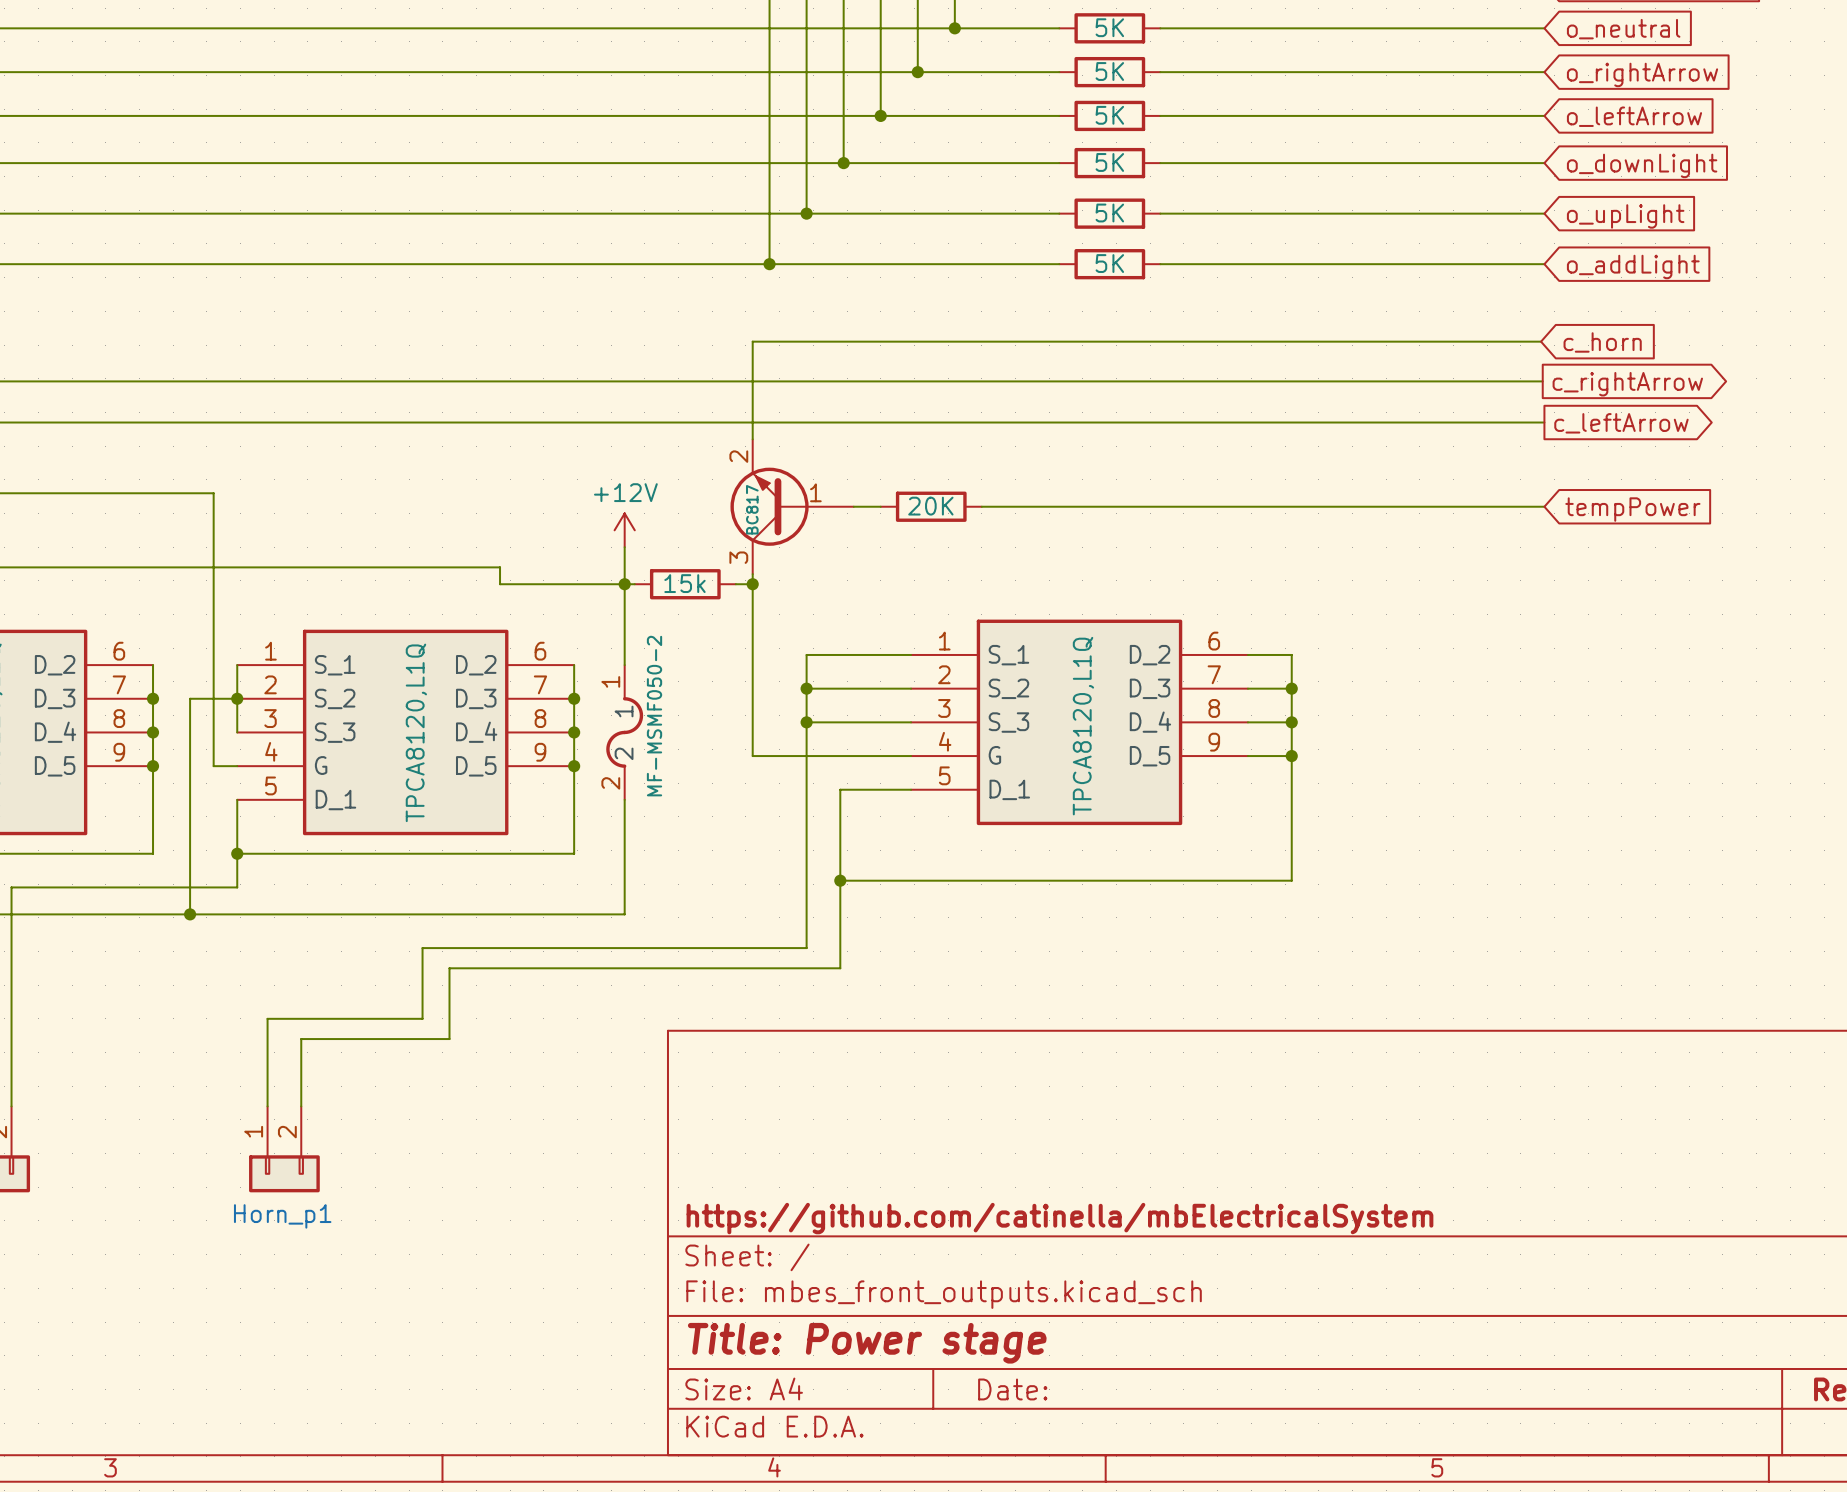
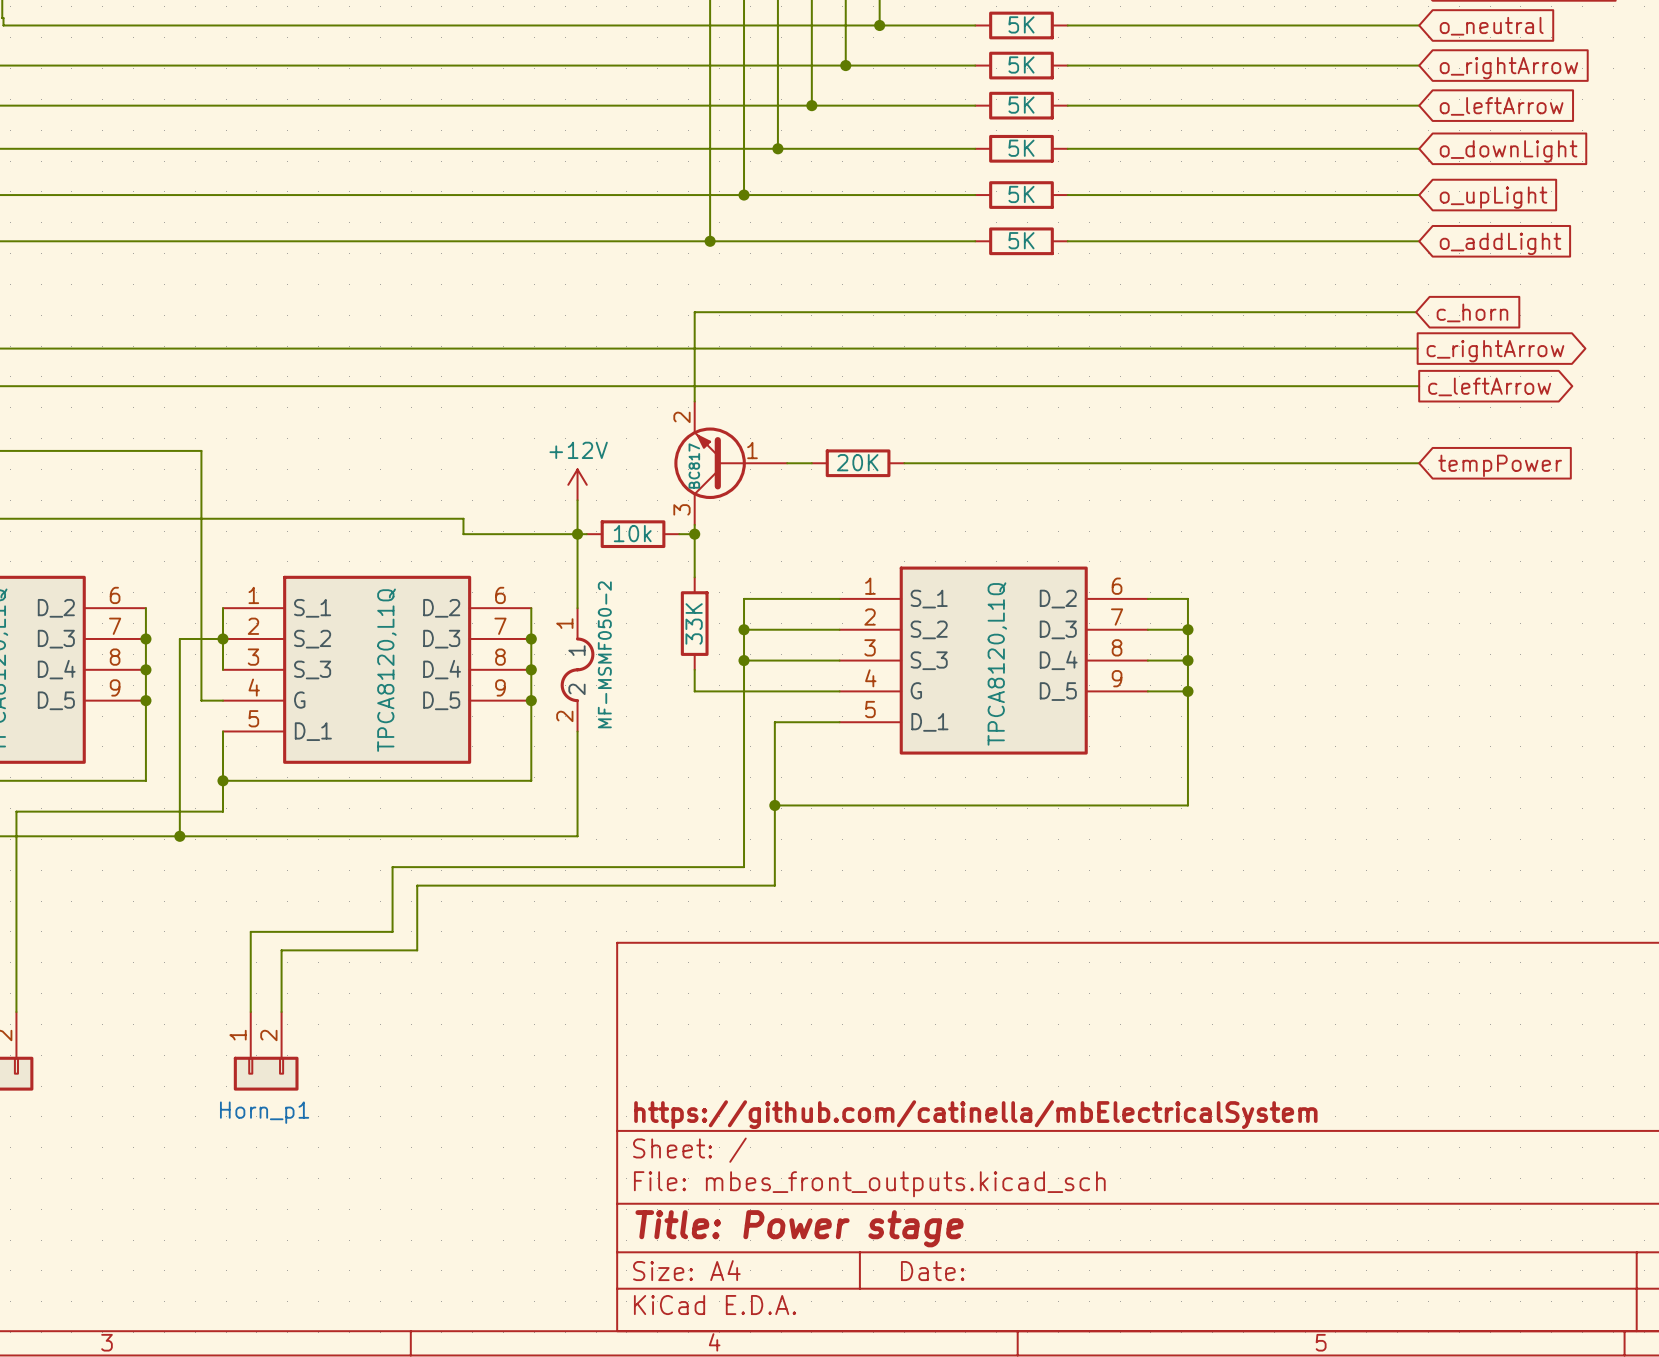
part value: 15k (684, 583) -> 10k (632, 533)
wire: (752, 631) (752, 732) -> none
part: none -> 33K (694, 623)

